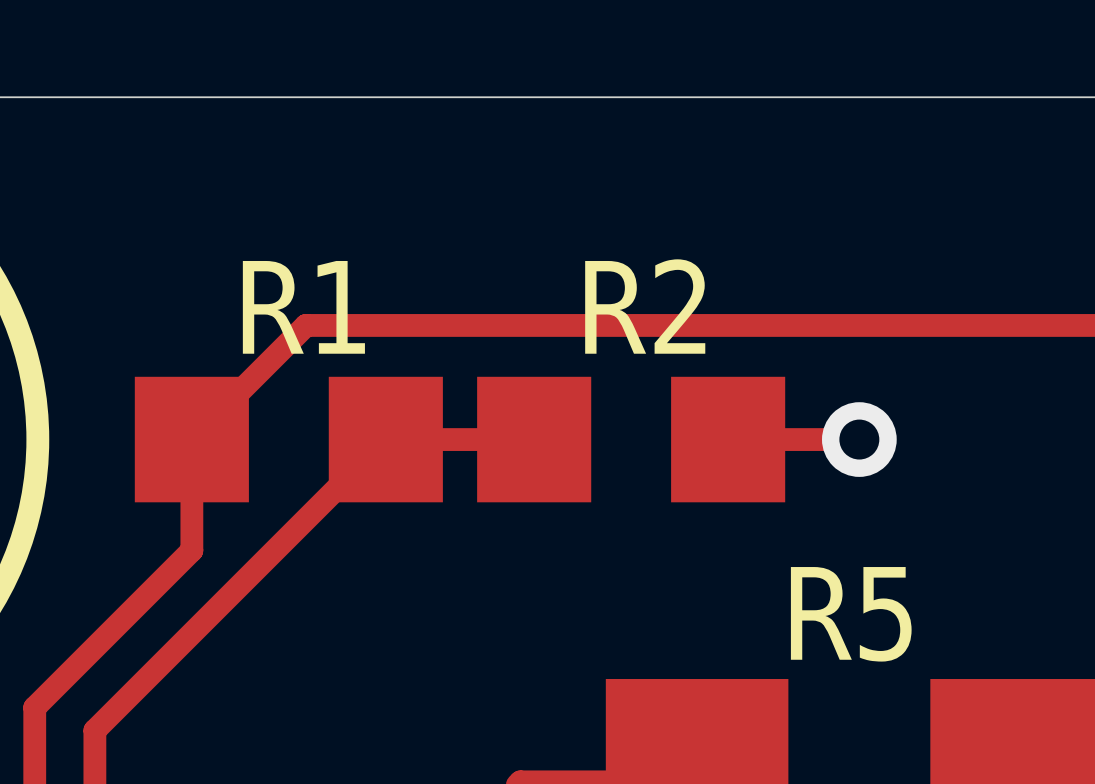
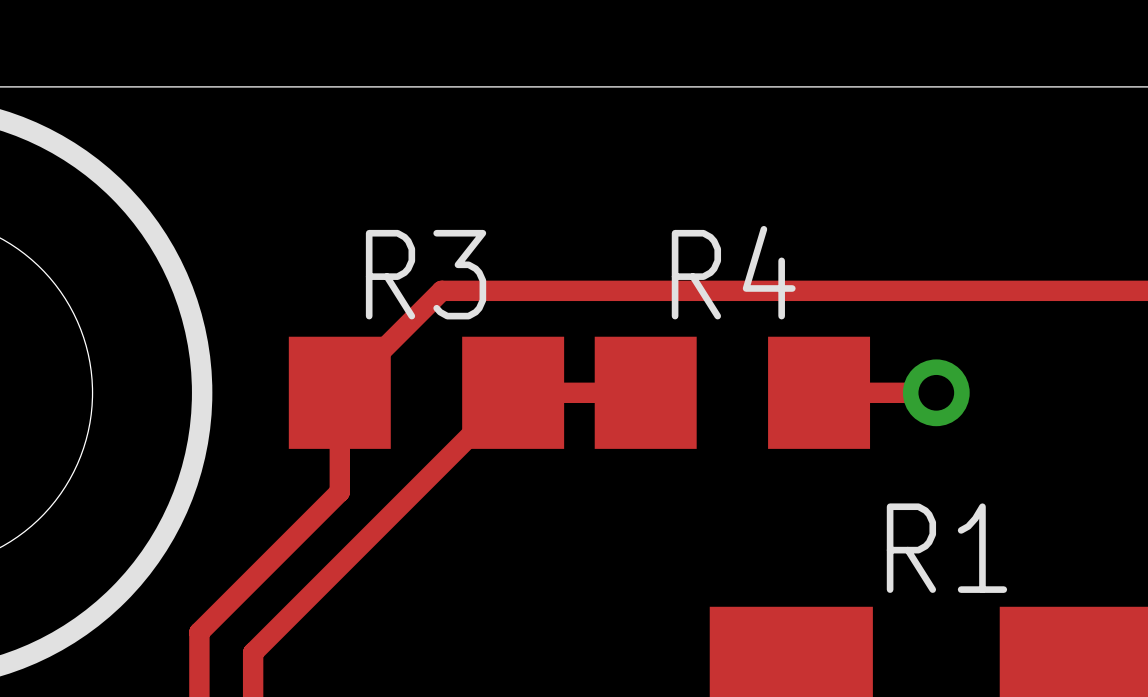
R2 name: R2 (645, 306) -> R4 (733, 272)
R1 name: R1 (303, 307) -> R3 (426, 274)
R5 name: R5 (851, 614) -> R1 (946, 548)

